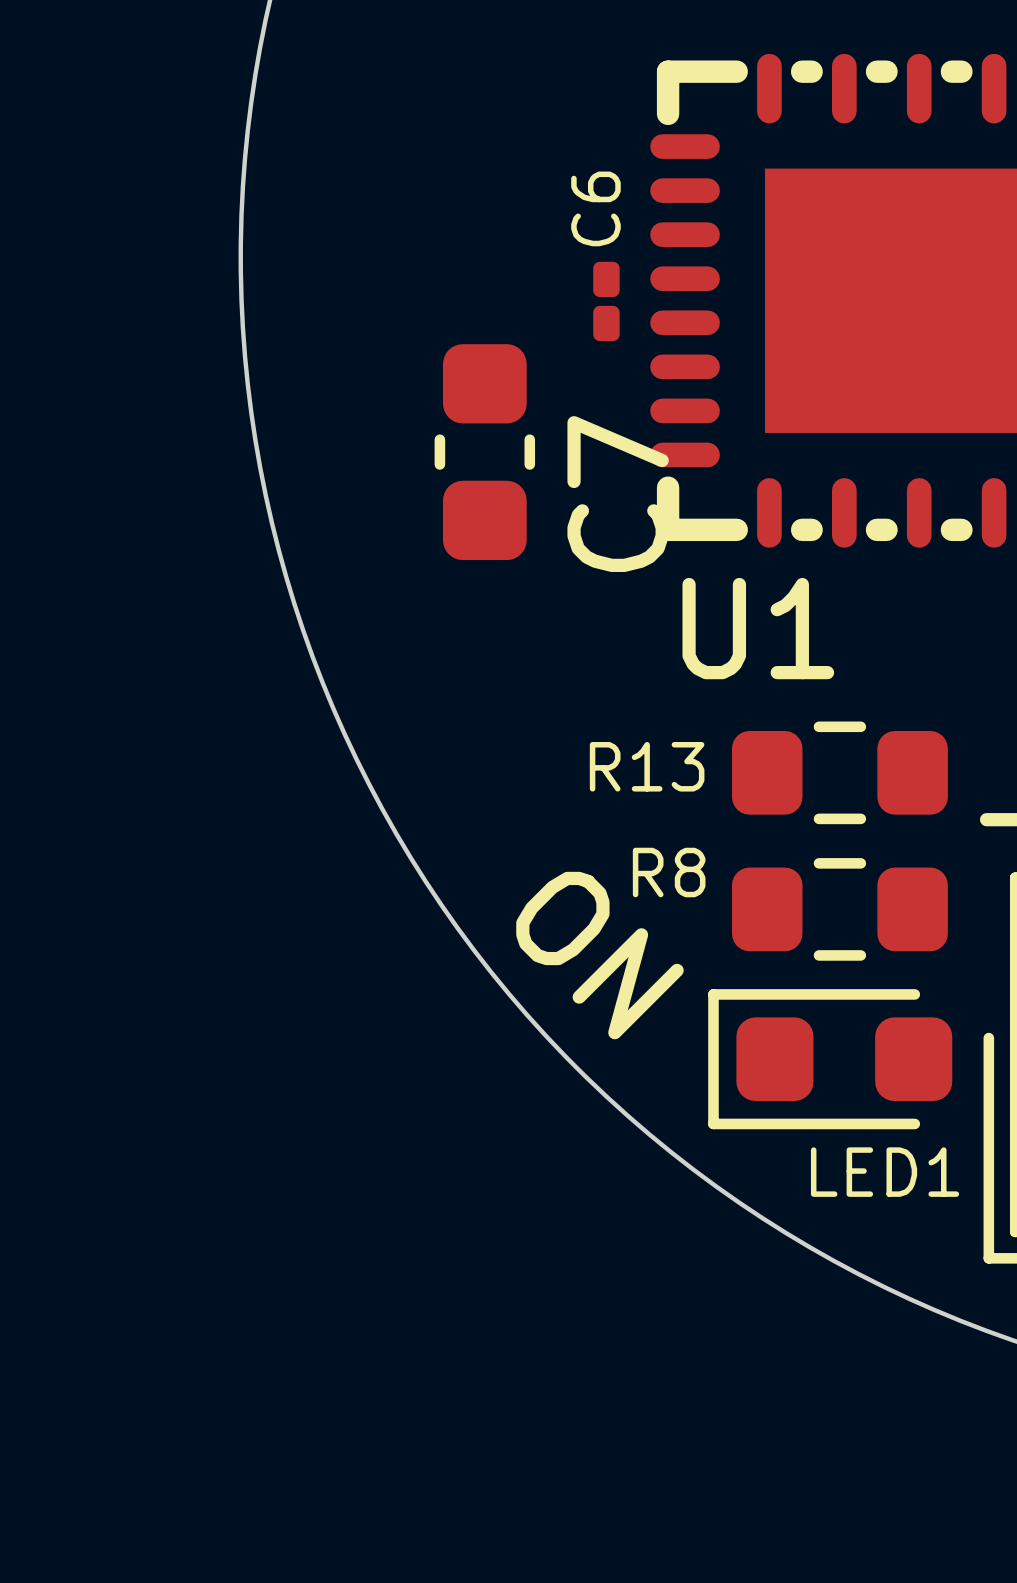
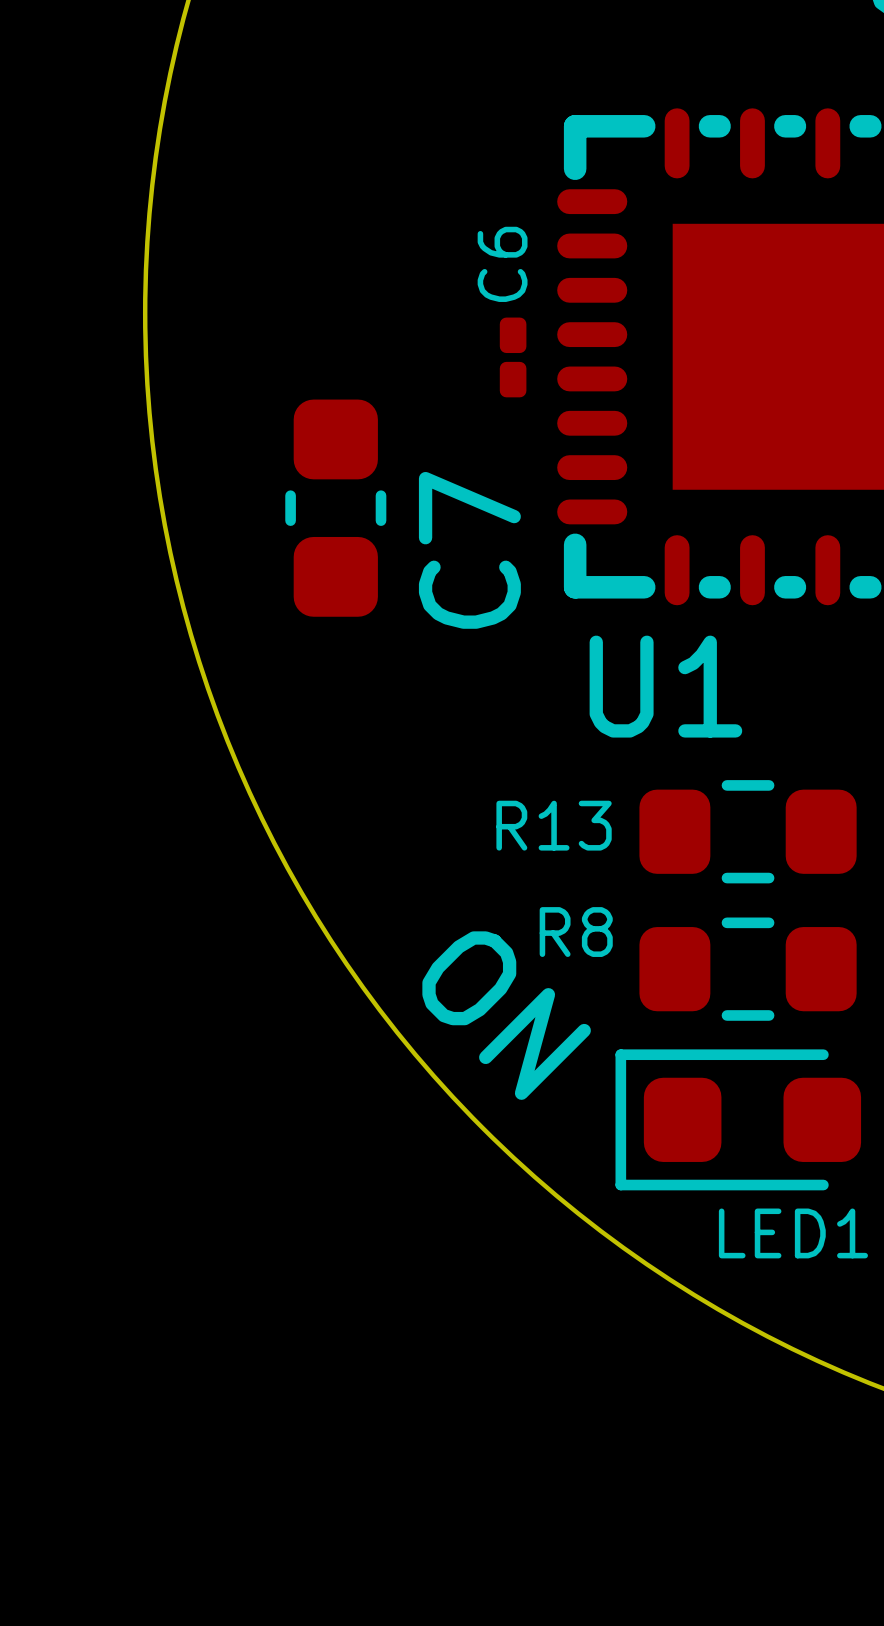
C7 position: (484, 452) -> (335, 508)

